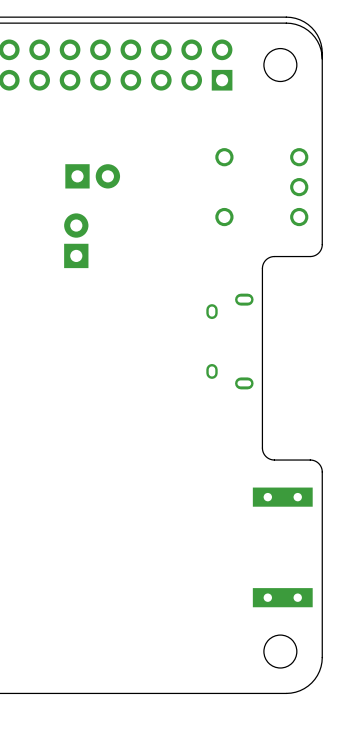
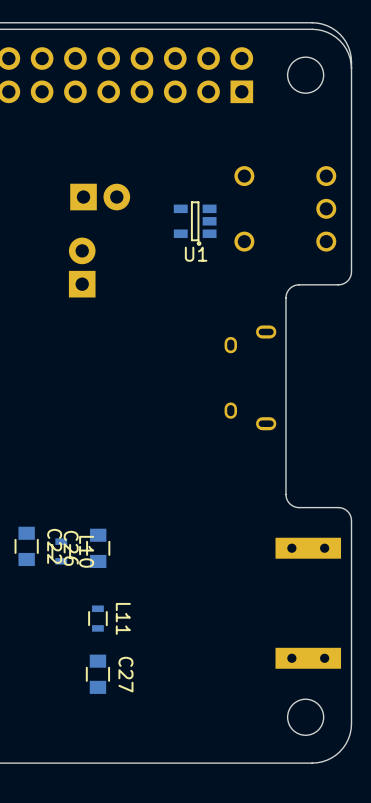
U1: none -> (195, 223)
C22: none -> (26, 546)
C26: none -> (98, 548)
L10: none -> (61, 551)
L11: none -> (97, 618)
C27: none -> (97, 674)

